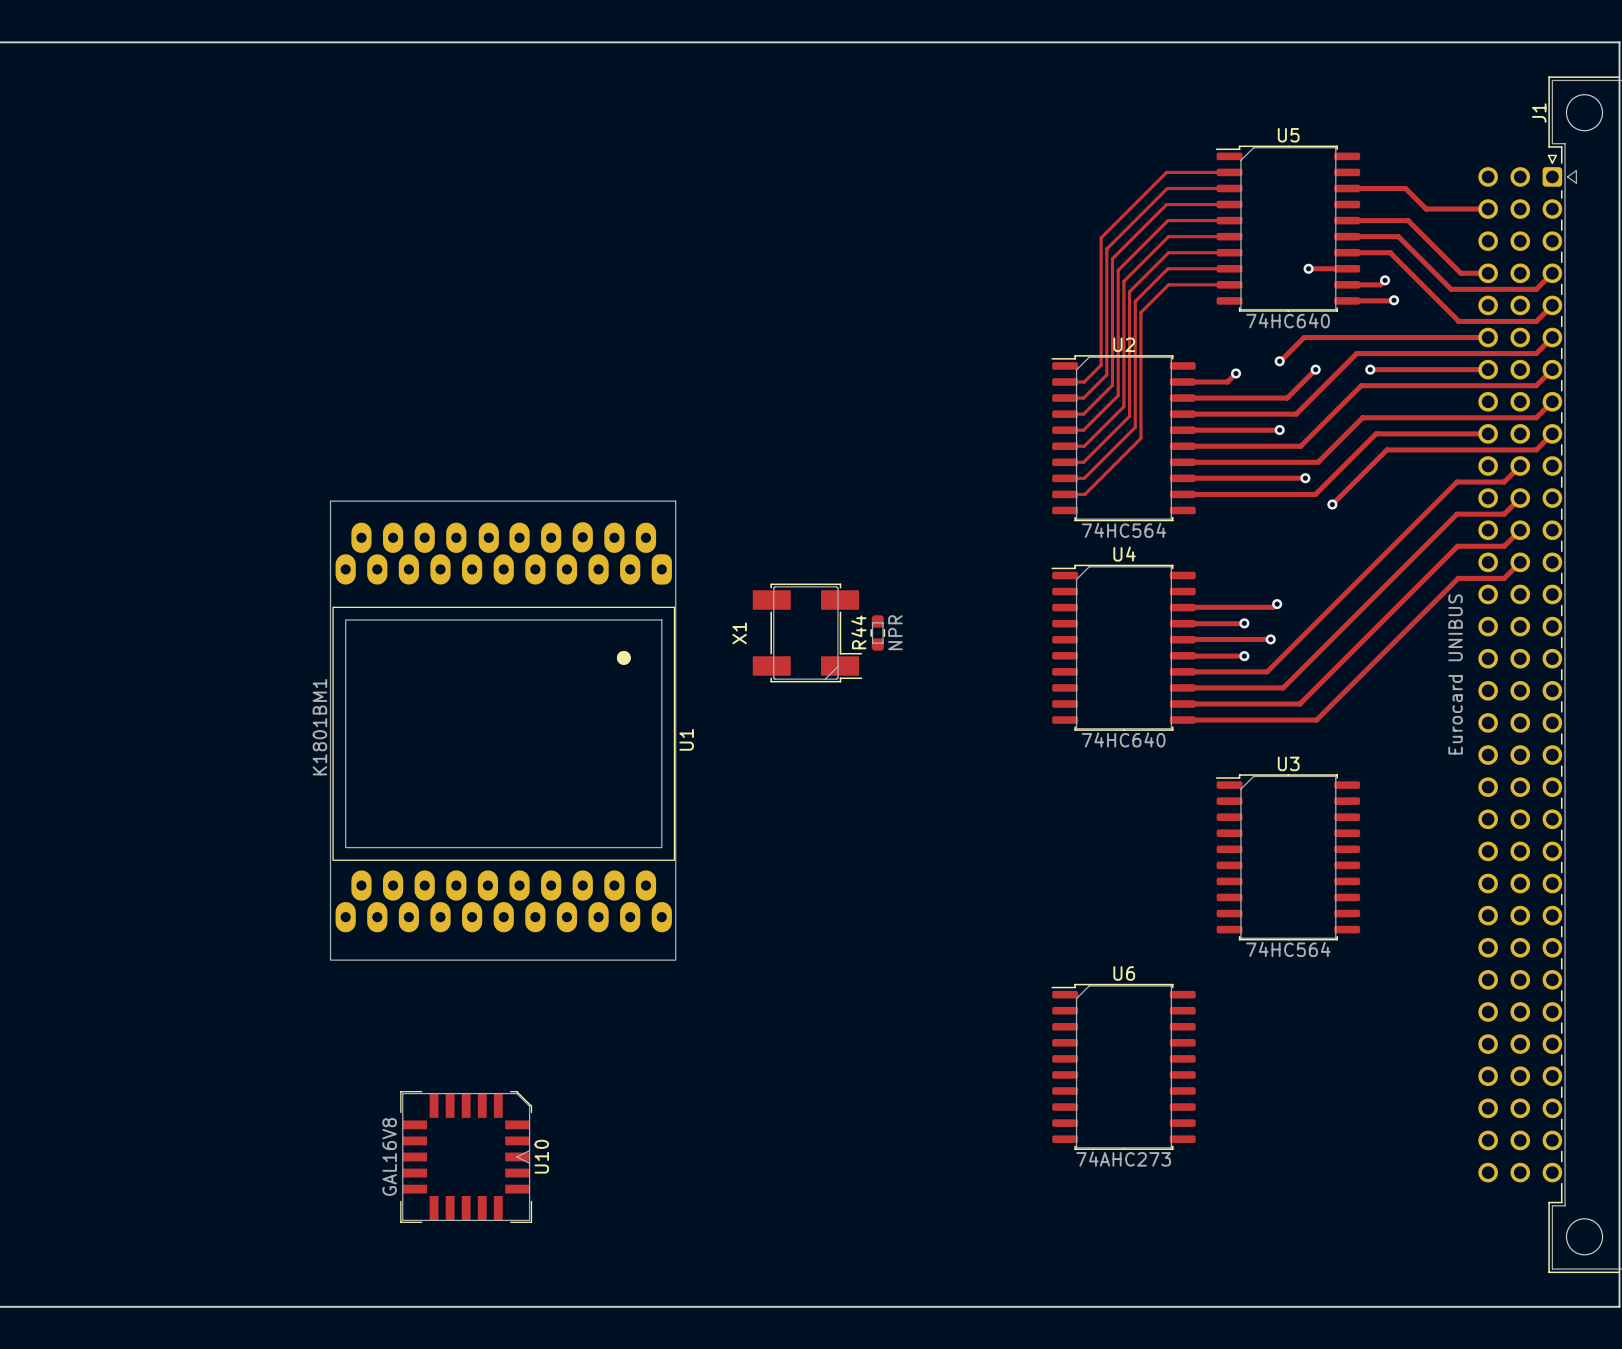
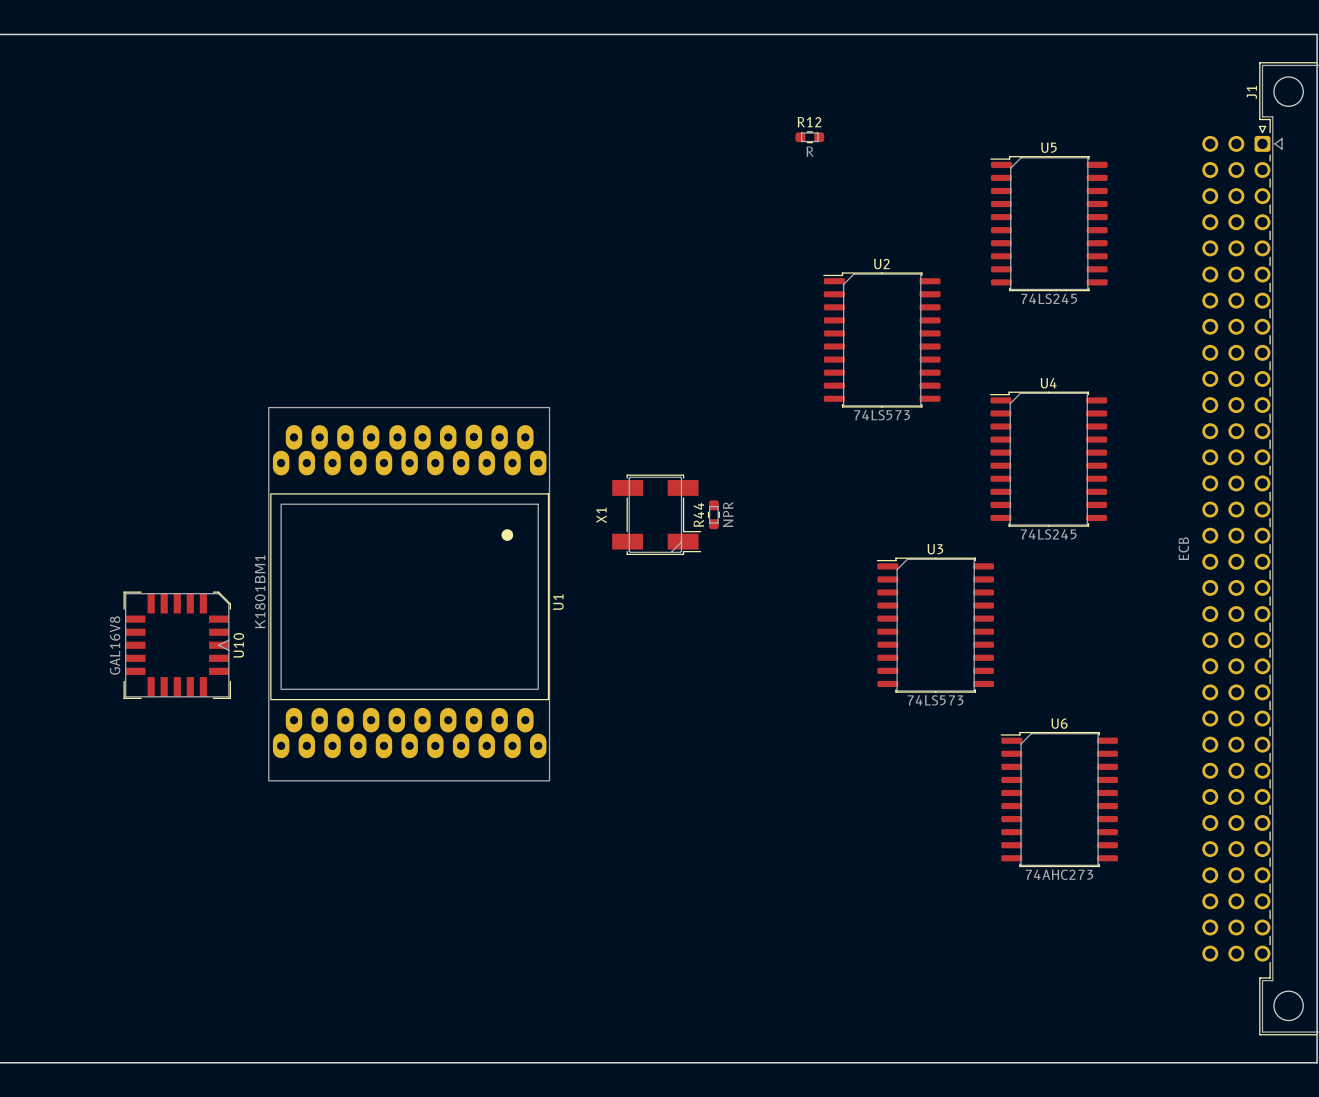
R12: none -> R (809, 137)
track: (1229, 172) (1166, 172) (1101, 237) (1101, 365) (1084, 382) (1065, 382) -> none
track: (1229, 188) (1167, 188) (1106, 248) (1106, 374) (1083, 398) (1065, 398) -> none
track: (1347, 188) (1405, 188) (1426, 209) (1488, 209) -> none
track: (1229, 204) (1166, 204) (1112, 258) (1112, 385) (1083, 414) (1065, 414) -> none
track: (1229, 220) (1167, 220) (1118, 270) (1118, 395) (1083, 430) (1065, 430) -> none
track: (1347, 220) (1408, 220) (1460, 273) (1488, 273) -> none
U5 position: (1288, 228) -> (1048, 223)
track: (1229, 236) (1168, 236) (1123, 281) (1123, 406) (1084, 446) (1065, 446) -> none
track: (1347, 236) (1398, 236) (1451, 289) (1536, 289) (1552, 273) -> none
track: (1229, 252) (1168, 252) (1129, 291) (1129, 416) (1083, 462) (1065, 462) -> none
track: (1347, 252) (1390, 252) (1458, 321) (1536, 321) (1552, 305) -> none
track: (1229, 268) (1167, 268) (1135, 301) (1135, 427) (1084, 478) (1065, 478) -> none
track: (1308, 268) (1347, 268) -> none
via: (1308, 268) -> none
track: (1385, 280) (1380, 284) (1347, 284) -> none
via: (1385, 280) -> none
track: (1229, 284) (1168, 284) (1140, 312) (1140, 438) (1084, 494) (1065, 494) -> none
track: (1394, 300) (1347, 300) -> none
via: (1394, 300) -> none
U5 value: 74HC640 (1288, 320) -> 74LS245 (1049, 298)
track: (1488, 337) (1304, 337) (1279, 361) -> none
track: (1552, 337) (1536, 353) (1356, 353) (1296, 414) (1182, 414) -> none
via: (1279, 361) -> none
track: (1315, 369) (1287, 398) (1182, 398) -> none
via: (1315, 369) -> none
track: (1370, 369) (1488, 369) -> none
via: (1370, 369) -> none
track: (1552, 369) (1536, 385) (1361, 385) (1300, 446) (1182, 446) -> none
track: (1236, 373) (1227, 382) (1182, 382) -> none
via: (1236, 373) -> none
track: (1552, 401) (1536, 417) (1362, 417) (1318, 462) (1182, 462) -> none
track: (1182, 430) (1279, 430) -> none
via: (1279, 430) -> none
track: (1488, 433) (1376, 433) (1315, 494) (1182, 494) -> none
track: (1552, 433) (1536, 449) (1386, 449) (1332, 504) -> none
U2 position: (1123, 438) -> (881, 339)
track: (1520, 465) (1504, 482) (1456, 482) (1267, 671) (1182, 671) -> none
track: (1182, 478) (1305, 478) -> none
via: (1305, 478) -> none
track: (1520, 498) (1504, 514) (1456, 514) (1283, 687) (1182, 687) -> none
via: (1332, 504) -> none
U2 value: 74HC564 (1123, 530) -> 74LS573 (882, 415)
track: (1520, 530) (1504, 546) (1457, 546) (1299, 703) (1182, 703) -> none
track: (1520, 562) (1504, 578) (1458, 578) (1316, 720) (1182, 720) -> none
track: (1277, 604) (1273, 607) (1182, 607) -> none
via: (1277, 604) -> none
track: (1244, 623) (1182, 623) -> none
via: (1244, 623) -> none
track: (1270, 639) (1182, 639) -> none
via: (1270, 639) -> none
U4 position: (1123, 647) -> (1048, 459)
track: (1182, 655) (1244, 656) -> none
via: (1244, 656) -> none
J1 value: Eurocard UNIBUS (1455, 674) -> ECB (1183, 548)
U4 value: 74HC640 (1123, 739) -> 74LS245 (1048, 534)
U3 position: (1288, 857) -> (935, 625)
U3 value: 74HC564 (1288, 949) -> 74LS573 (935, 700)
U6 position: (1123, 1066) -> (1059, 799)
U10 position: (466, 1156) -> (177, 645)

